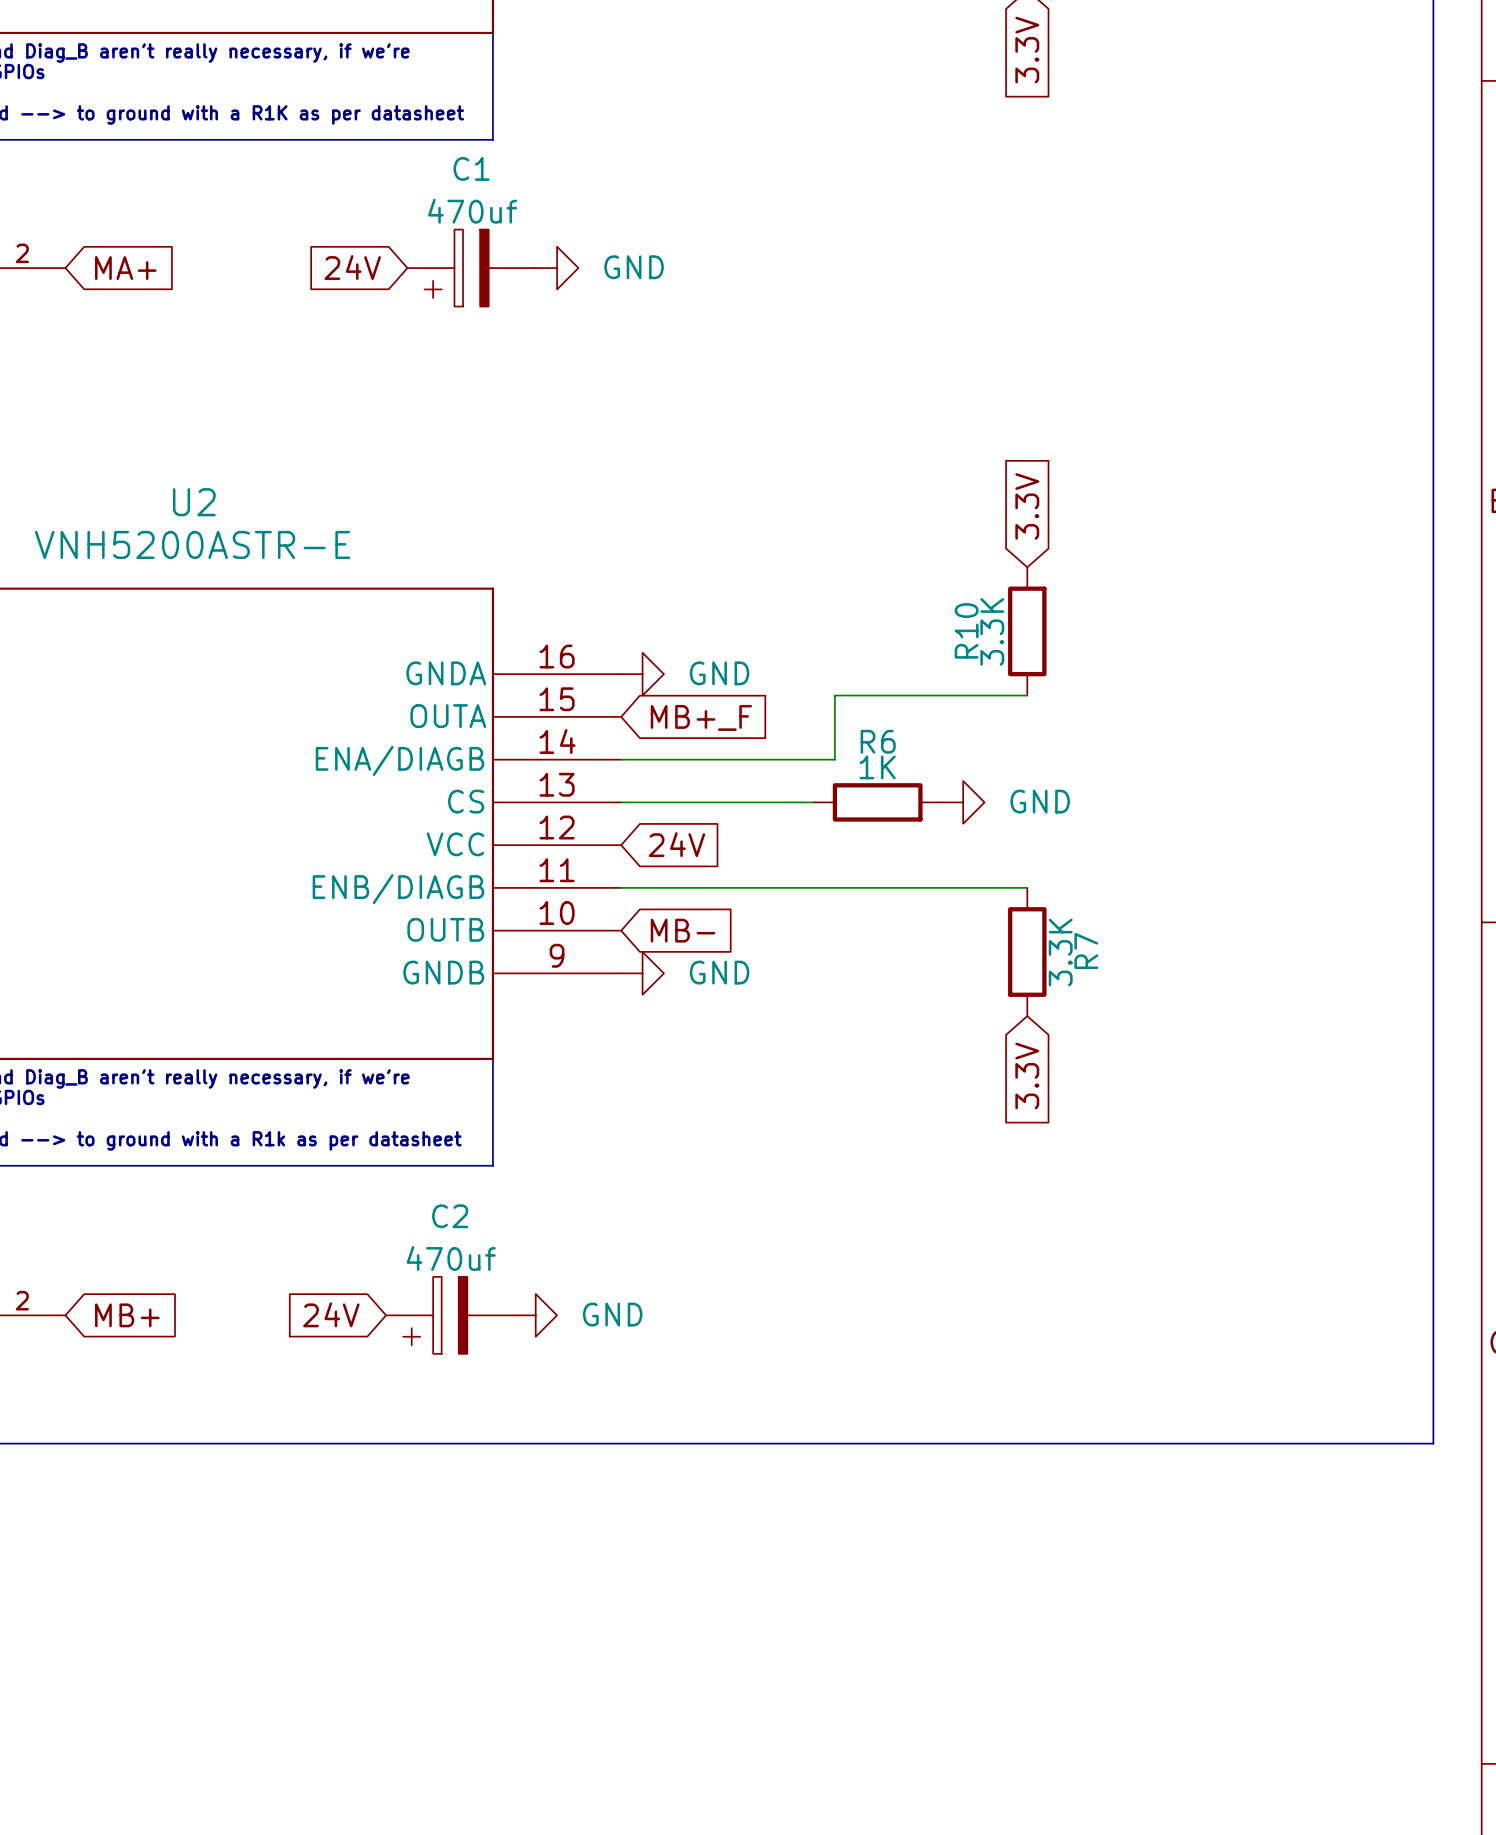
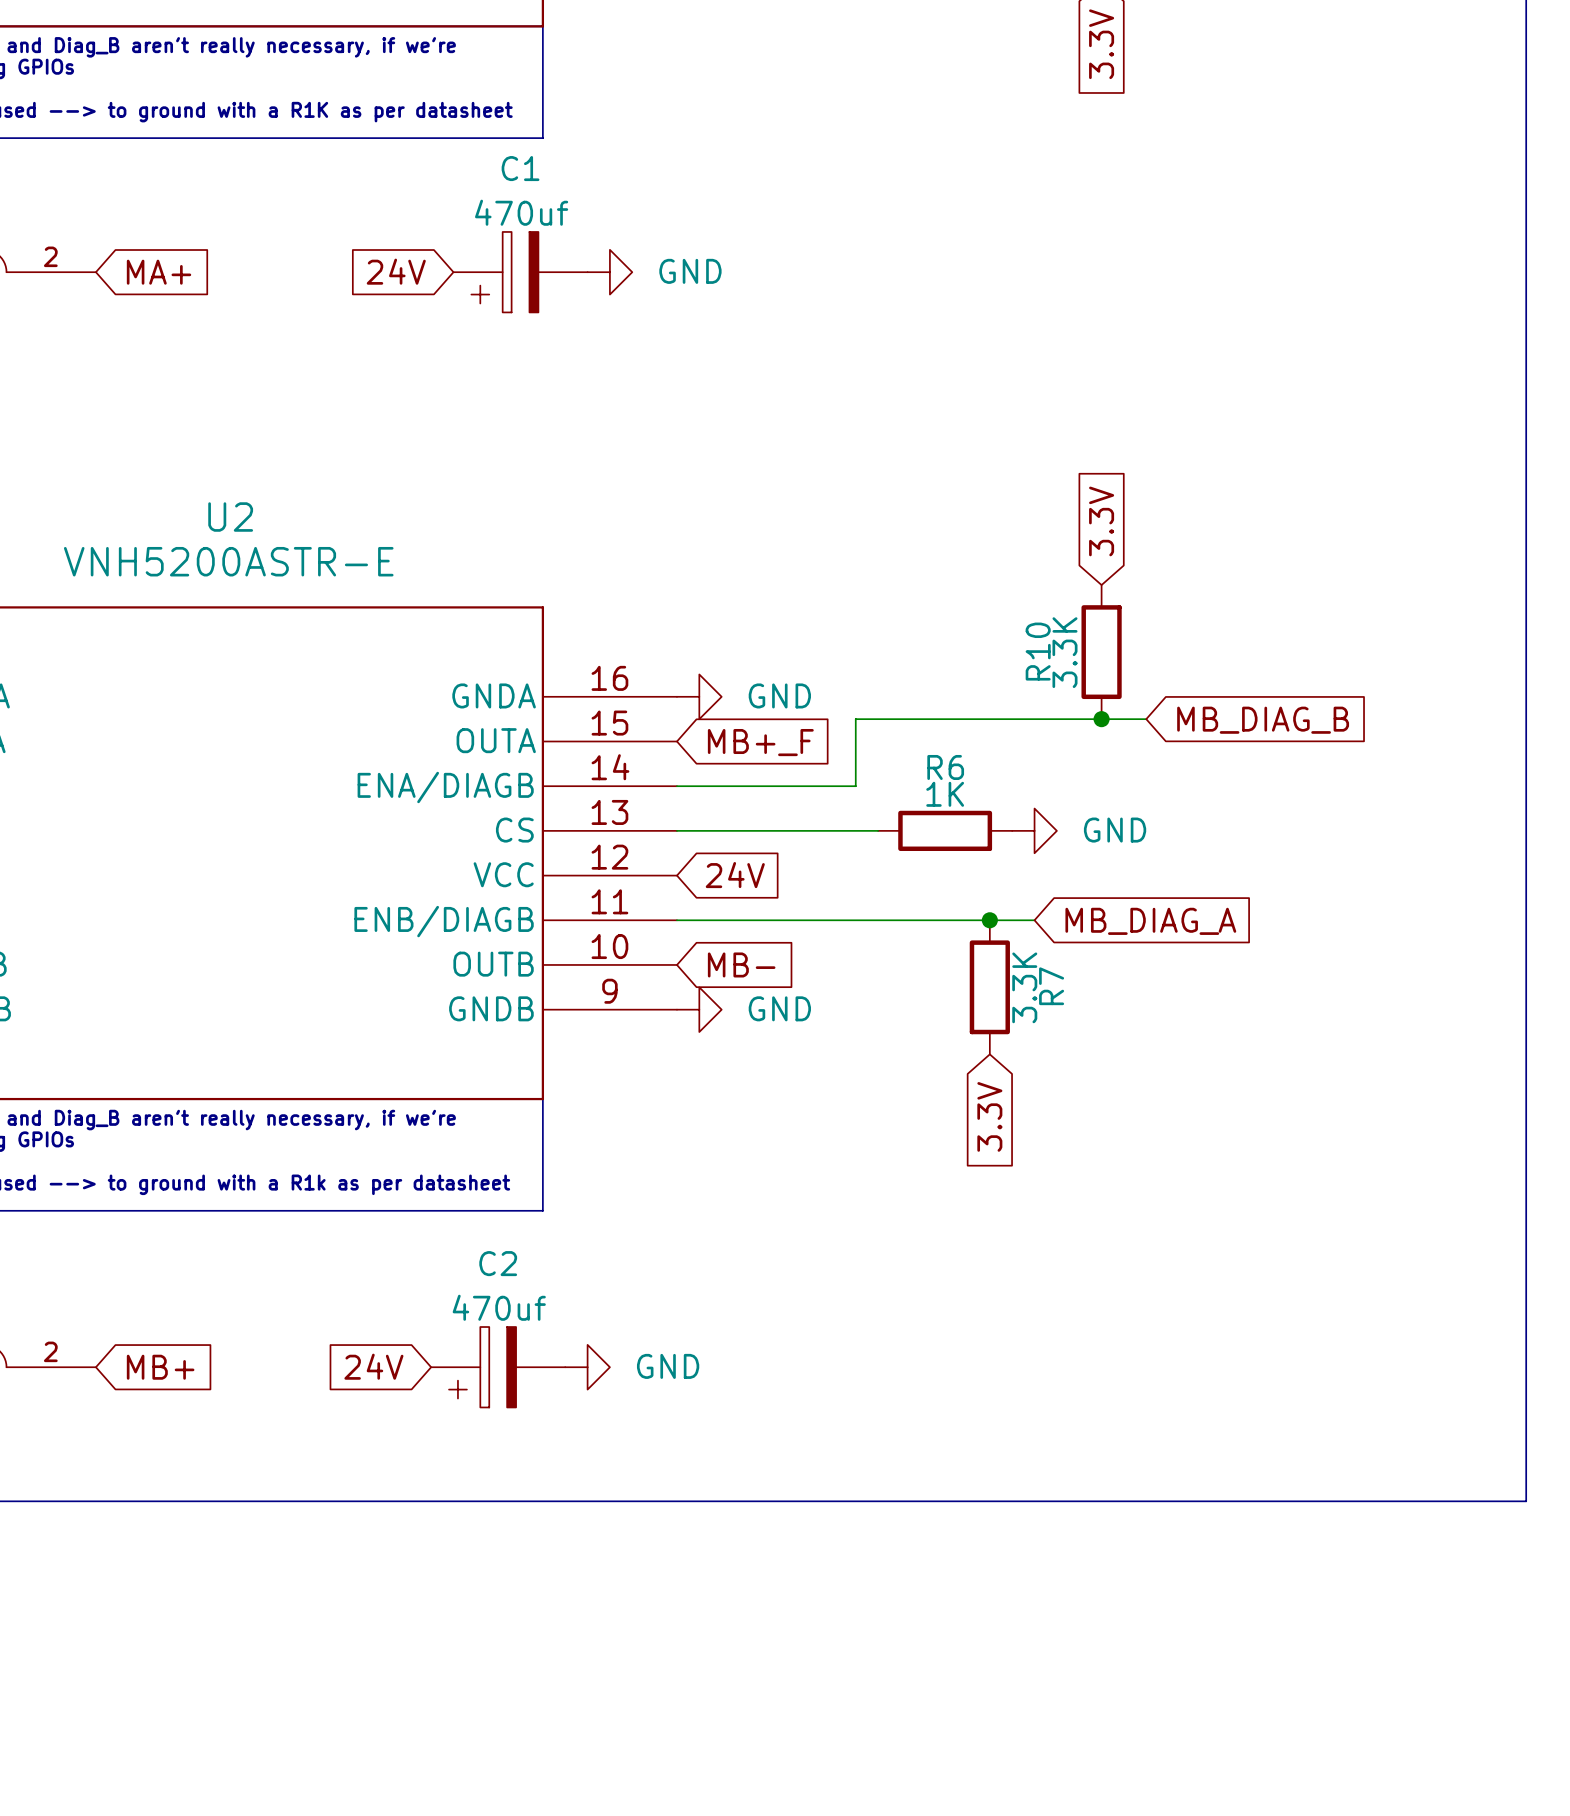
wire: (834, 695) (834, 759) (792, 759) -> (900, 719) (855, 719) (855, 786)
wire: none -> (1101, 719) (1146, 719)
junction: none -> (1101, 719)
global label: none -> MB_DIAG_B (1263, 720)
junction: none -> (989, 920)
wire: (963, 887) (1027, 887) -> none
global label: none -> MB_DIAG_A (1150, 921)
R7 position: (1027, 952) -> (989, 987)
global label position: 3.3V (1027, 1075) -> 3.3V (989, 1116)

